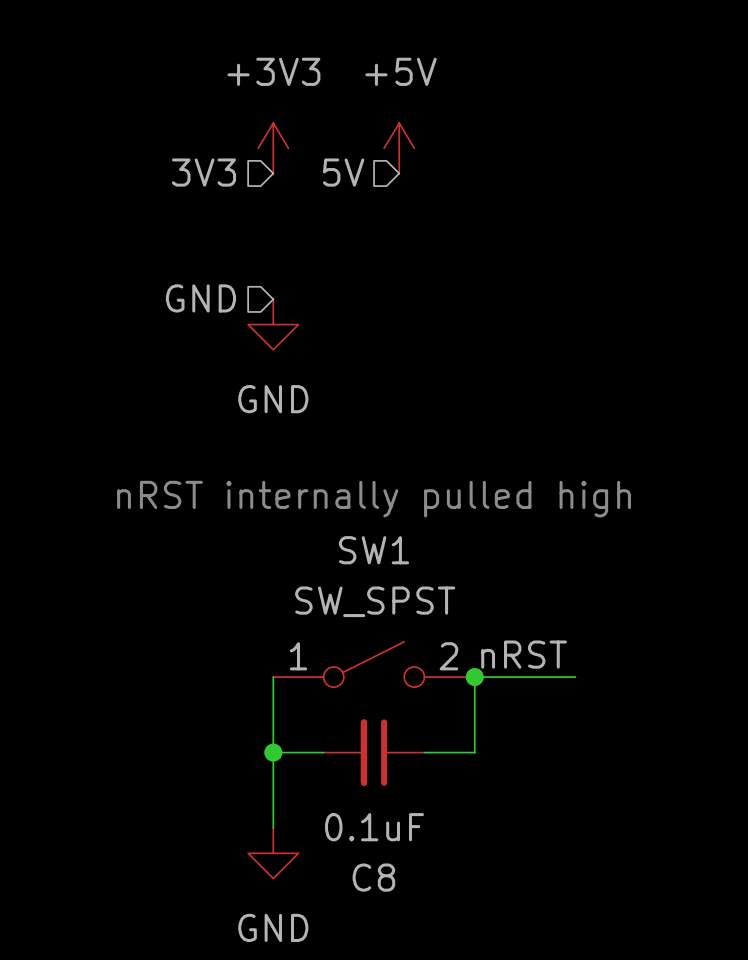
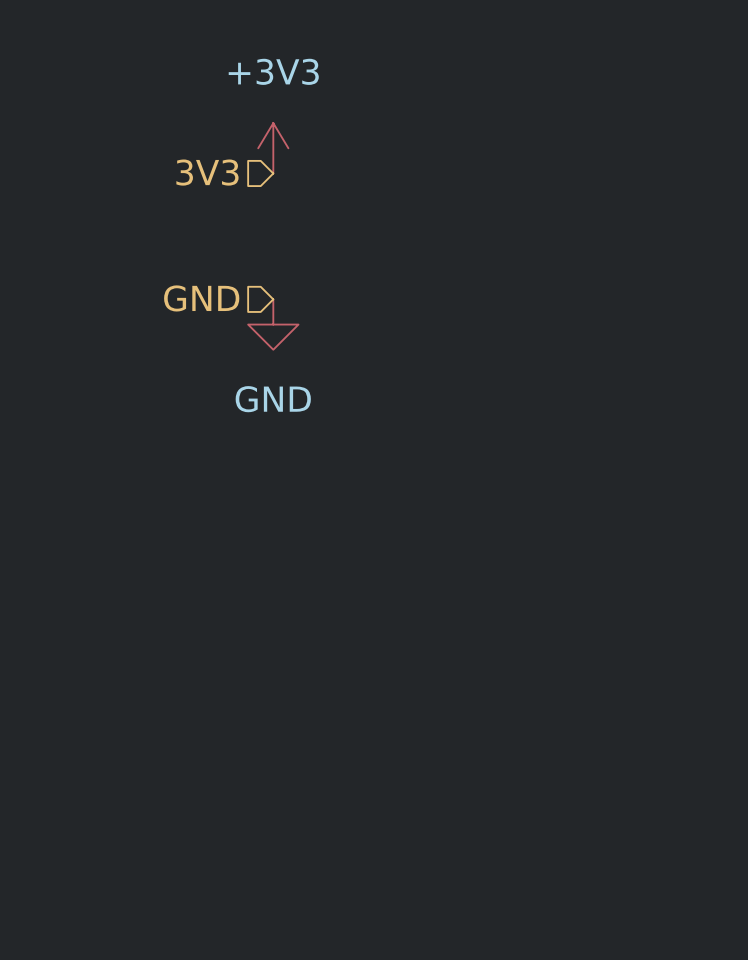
power symbol: +5V (399, 148) -> none
hierarchical label: 5V (343, 172) -> none
text: nRST internally pulled high (374, 499) -> none
label: nRST (524, 654) -> none
SW1: SW_SPST (374, 664) -> none
wire: (273, 677) (273, 828) -> none
junction: (474, 677) -> none
wire: (575, 677) (474, 677) (474, 752) (424, 752) -> none
wire: (273, 752) (323, 752) -> none
junction: (273, 752) -> none
C8: 0.1uF (374, 752) -> none
power symbol: GND (273, 853) -> none

